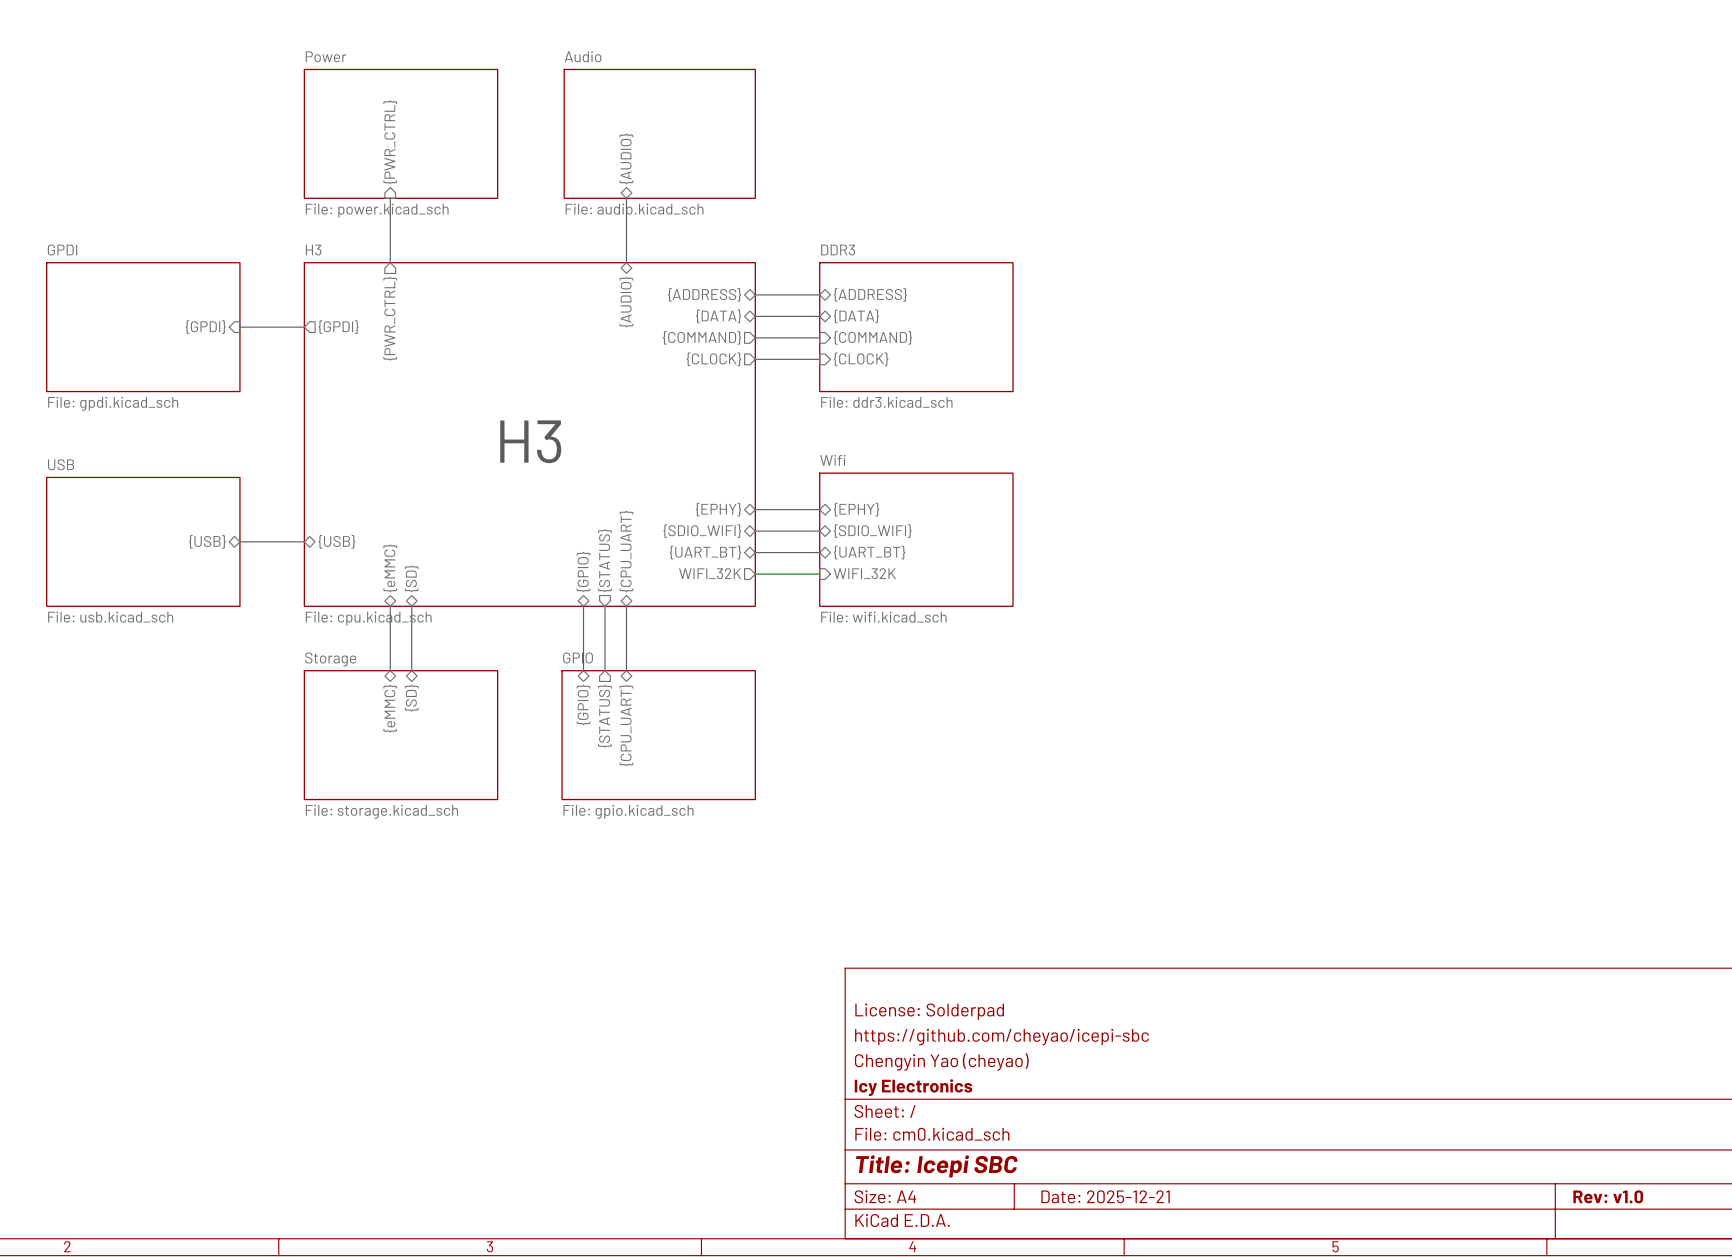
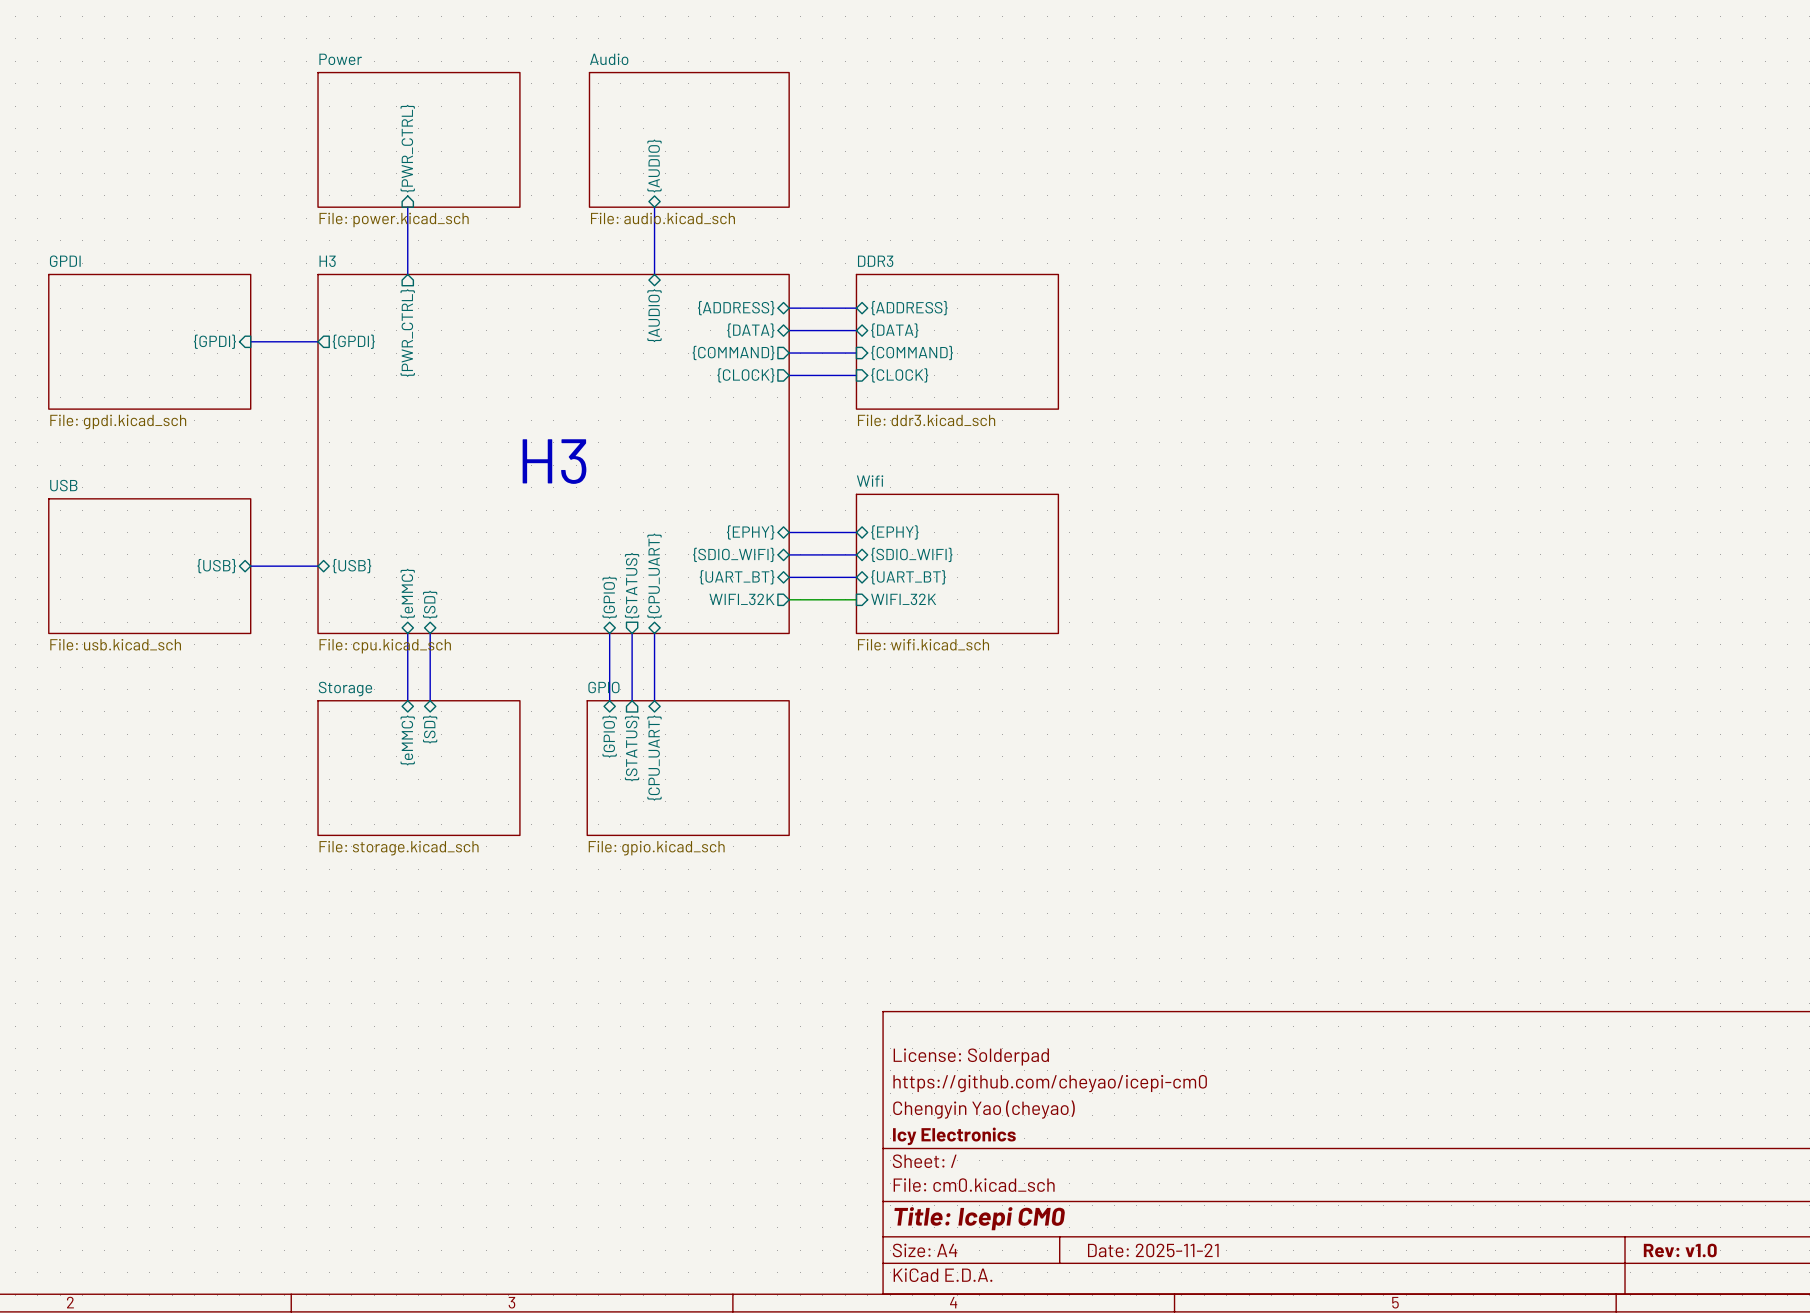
title block: https://github.com/cheyao/icepi-sbc (1002, 1037) -> https://github.com/cheyao/icepi-cm0 (1050, 1083)
title block: Title: Icepi SBC (936, 1166) -> Title: Icepi CM0 (979, 1218)
title block: Date: 2025-12-21 (1105, 1196) -> Date: 2025-11-21 (1153, 1250)

